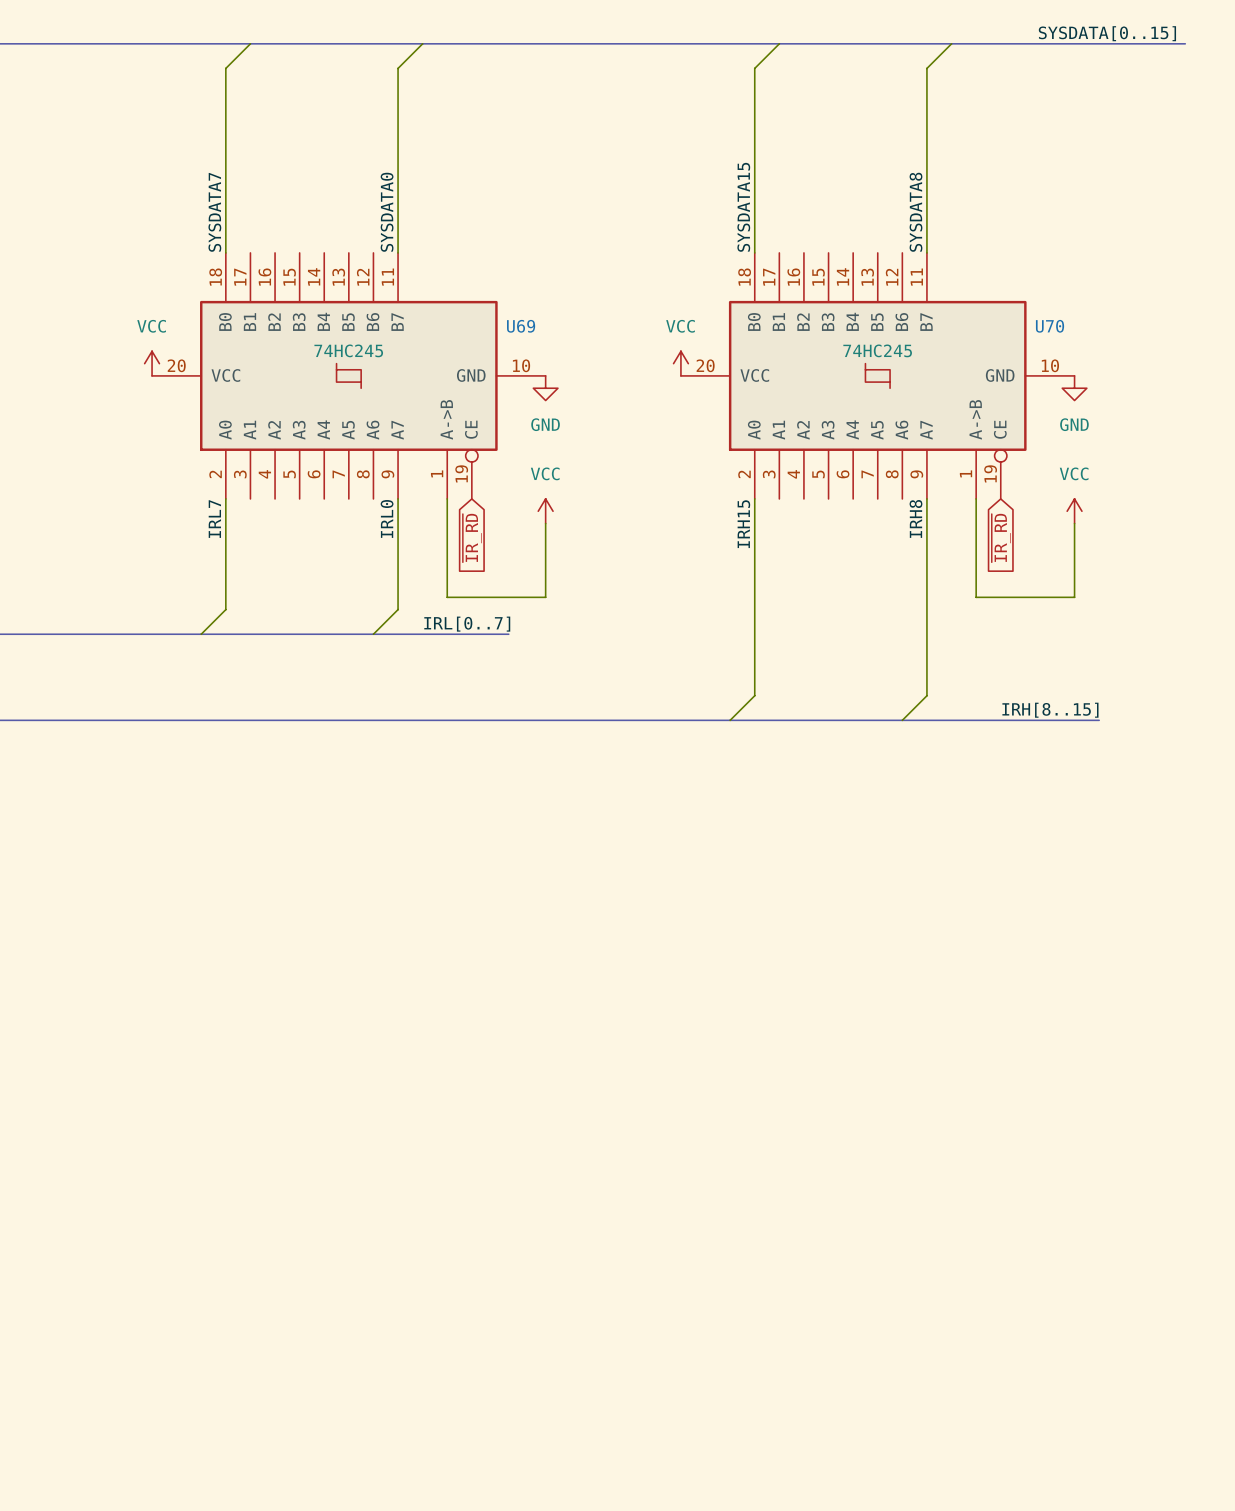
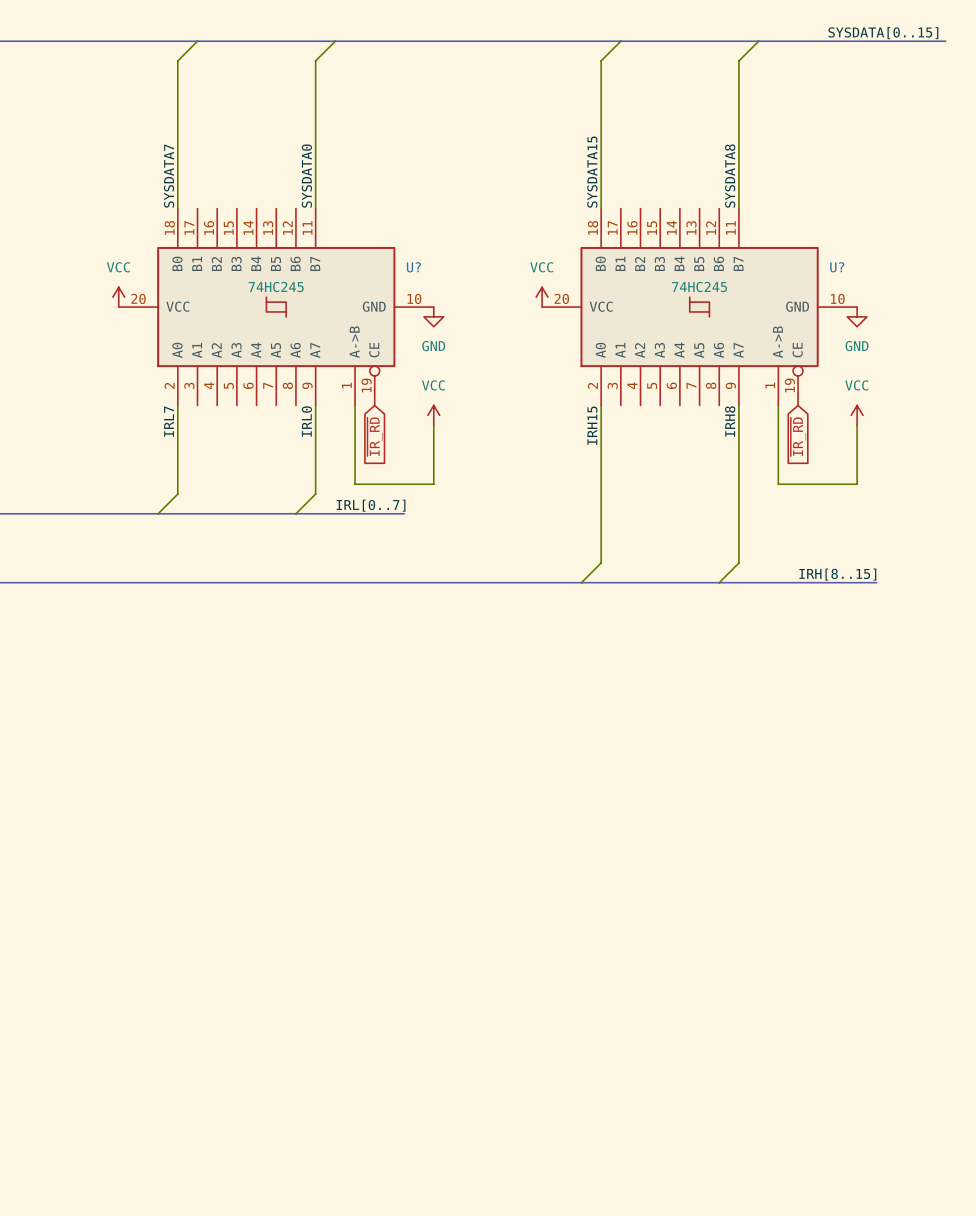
U69 name: U69 (521, 326) -> U? (413, 267)
U70 name: U70 (1050, 326) -> U? (837, 267)

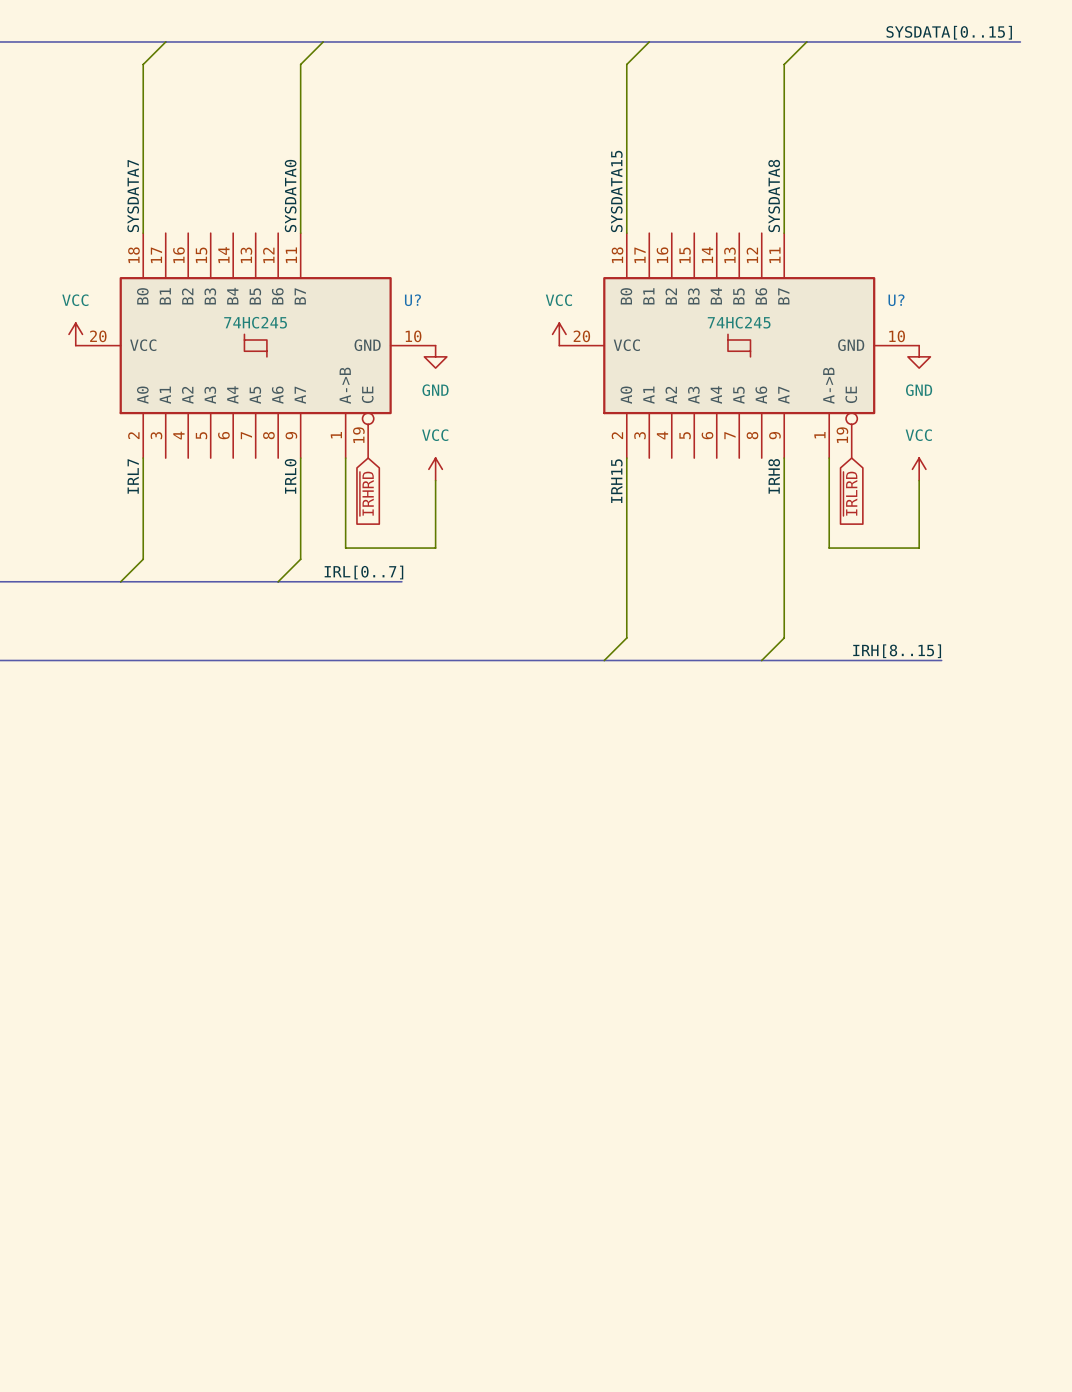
global label: ~{IR_RD} (375, 436) -> ~{IRHRD} (366, 493)
global label: ~{IR_RD} (798, 436) -> ~{IRLRD} (850, 493)

